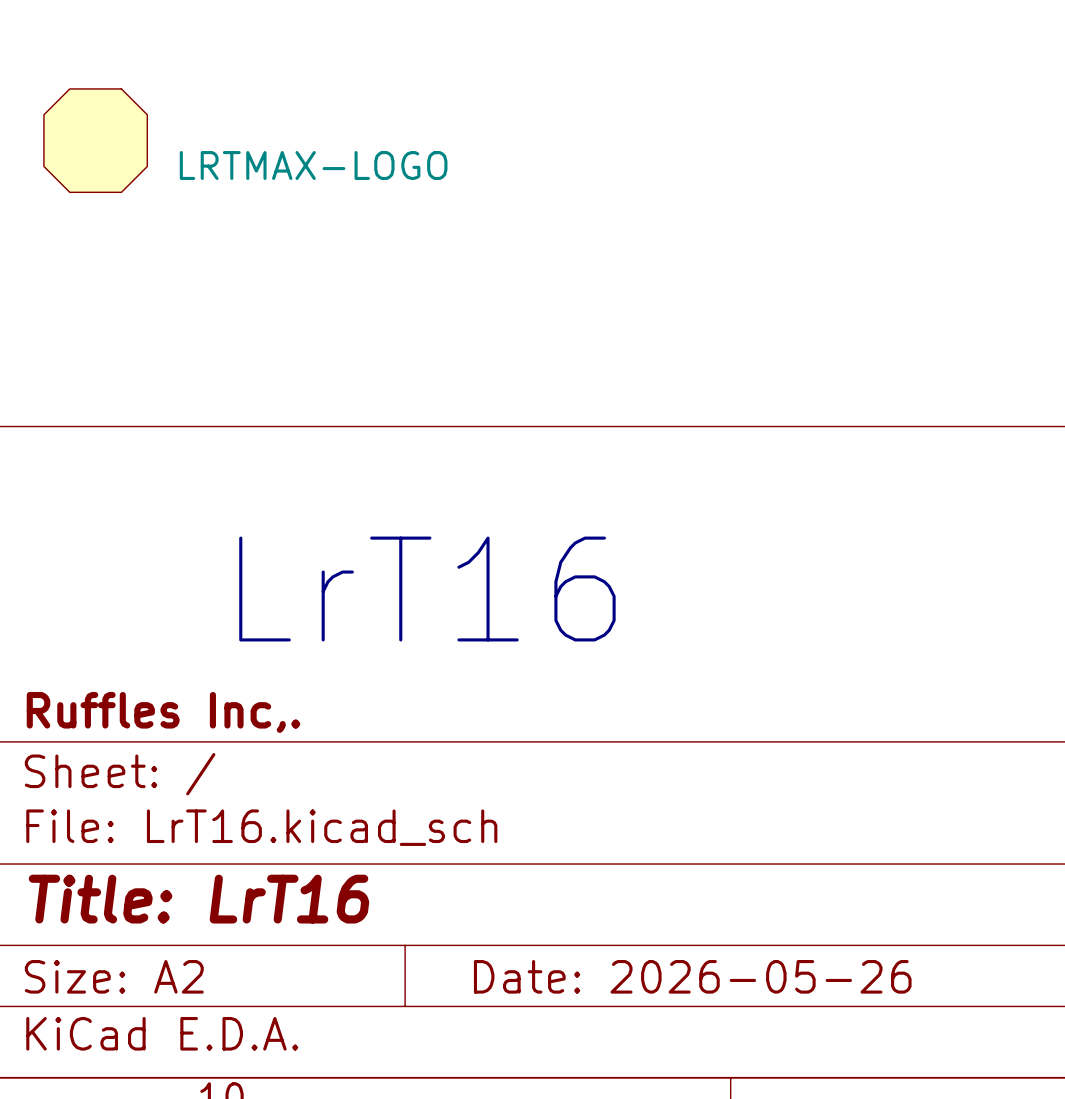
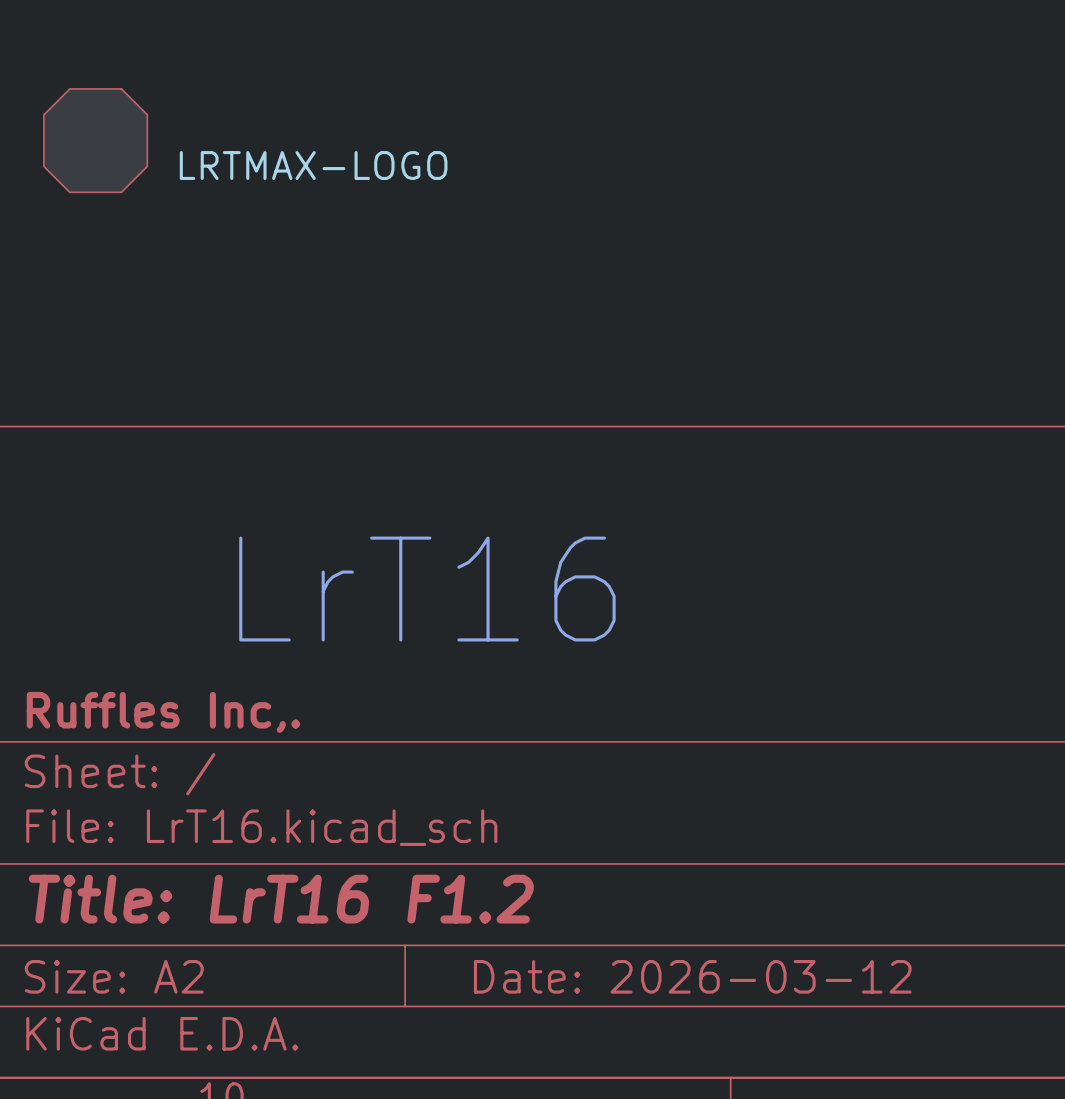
title block: Title: LrT16 (198, 899) -> Title: LrT16 F1.2 (281, 899)
title block: Date: 2026-05-26 (692, 976) -> Date: 2026-03-12 (692, 976)

